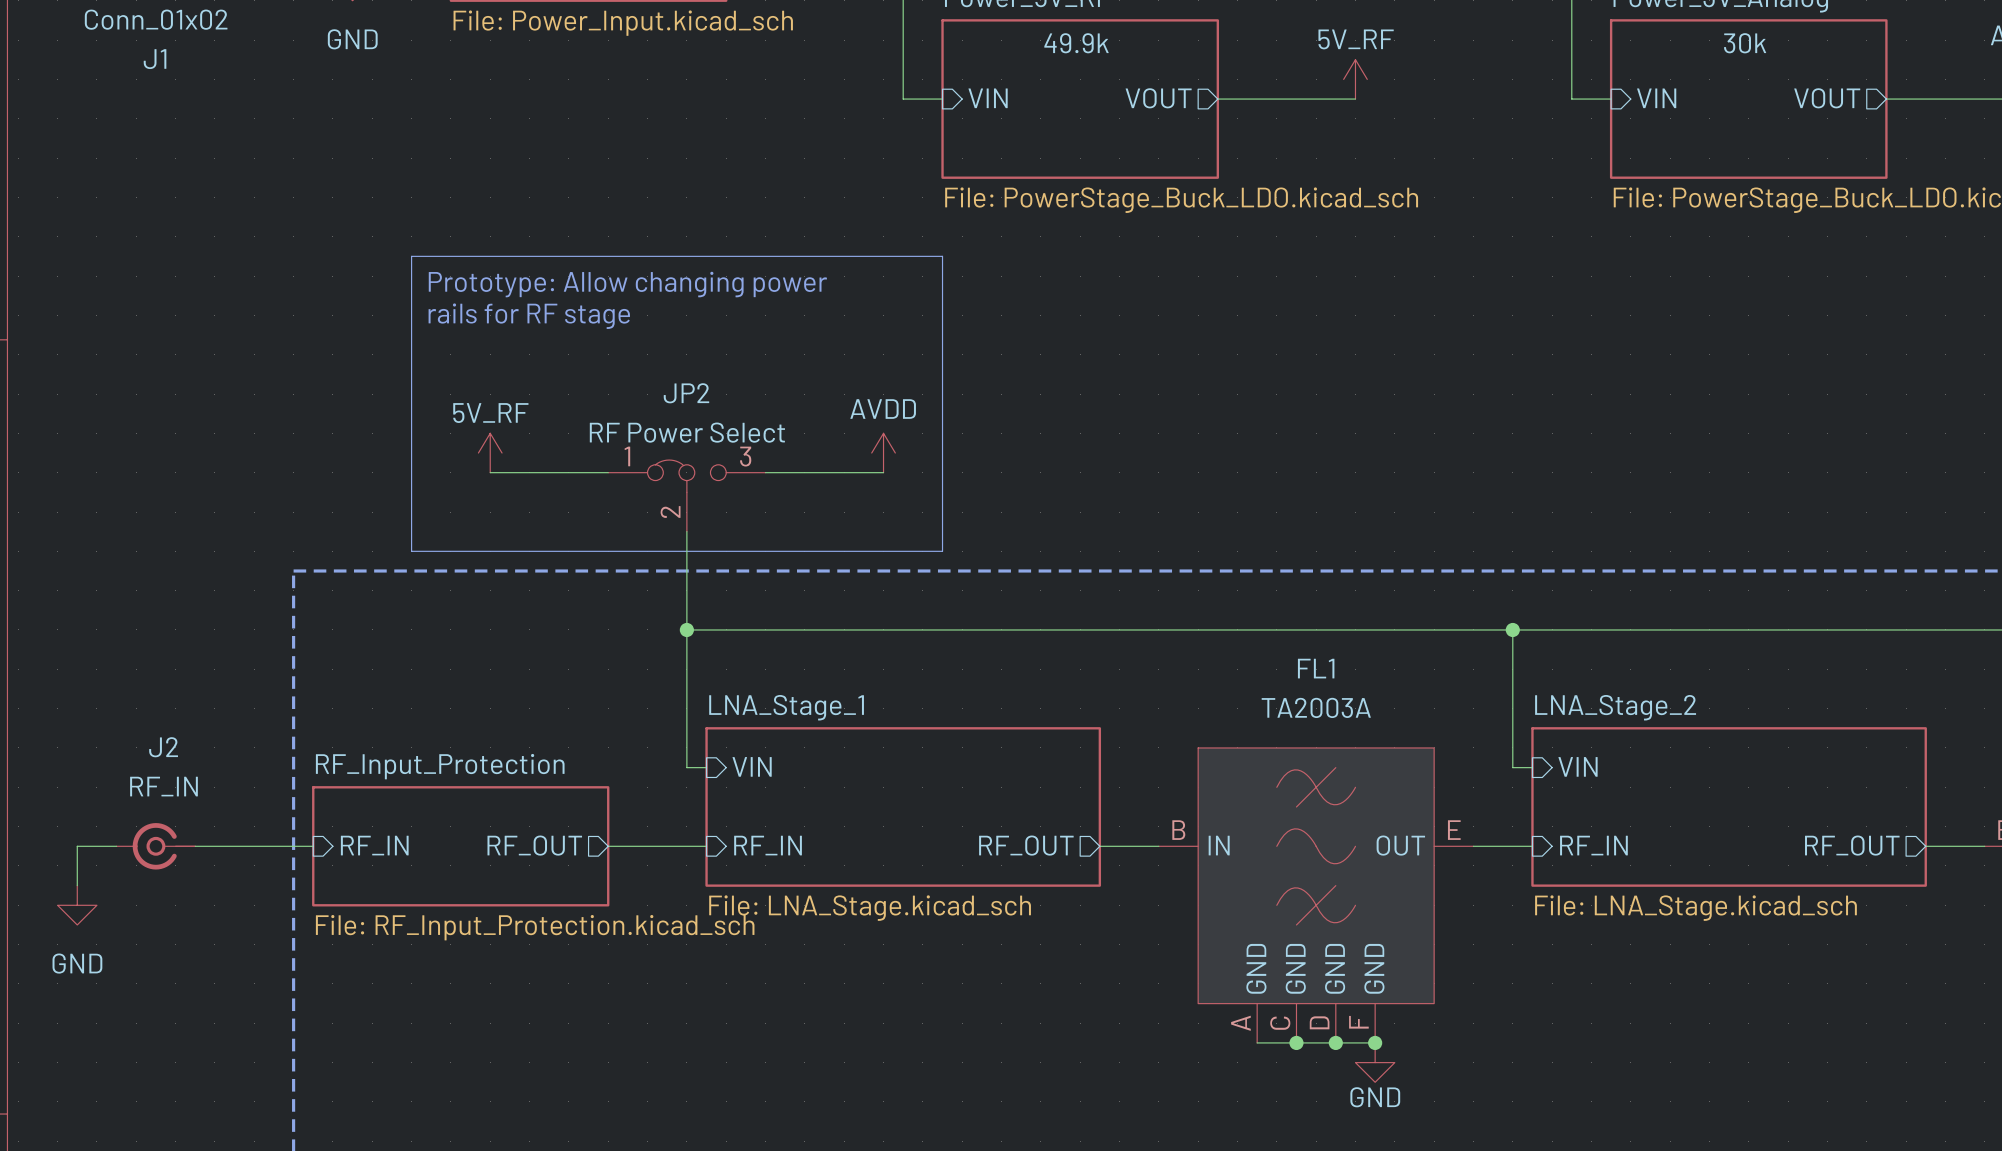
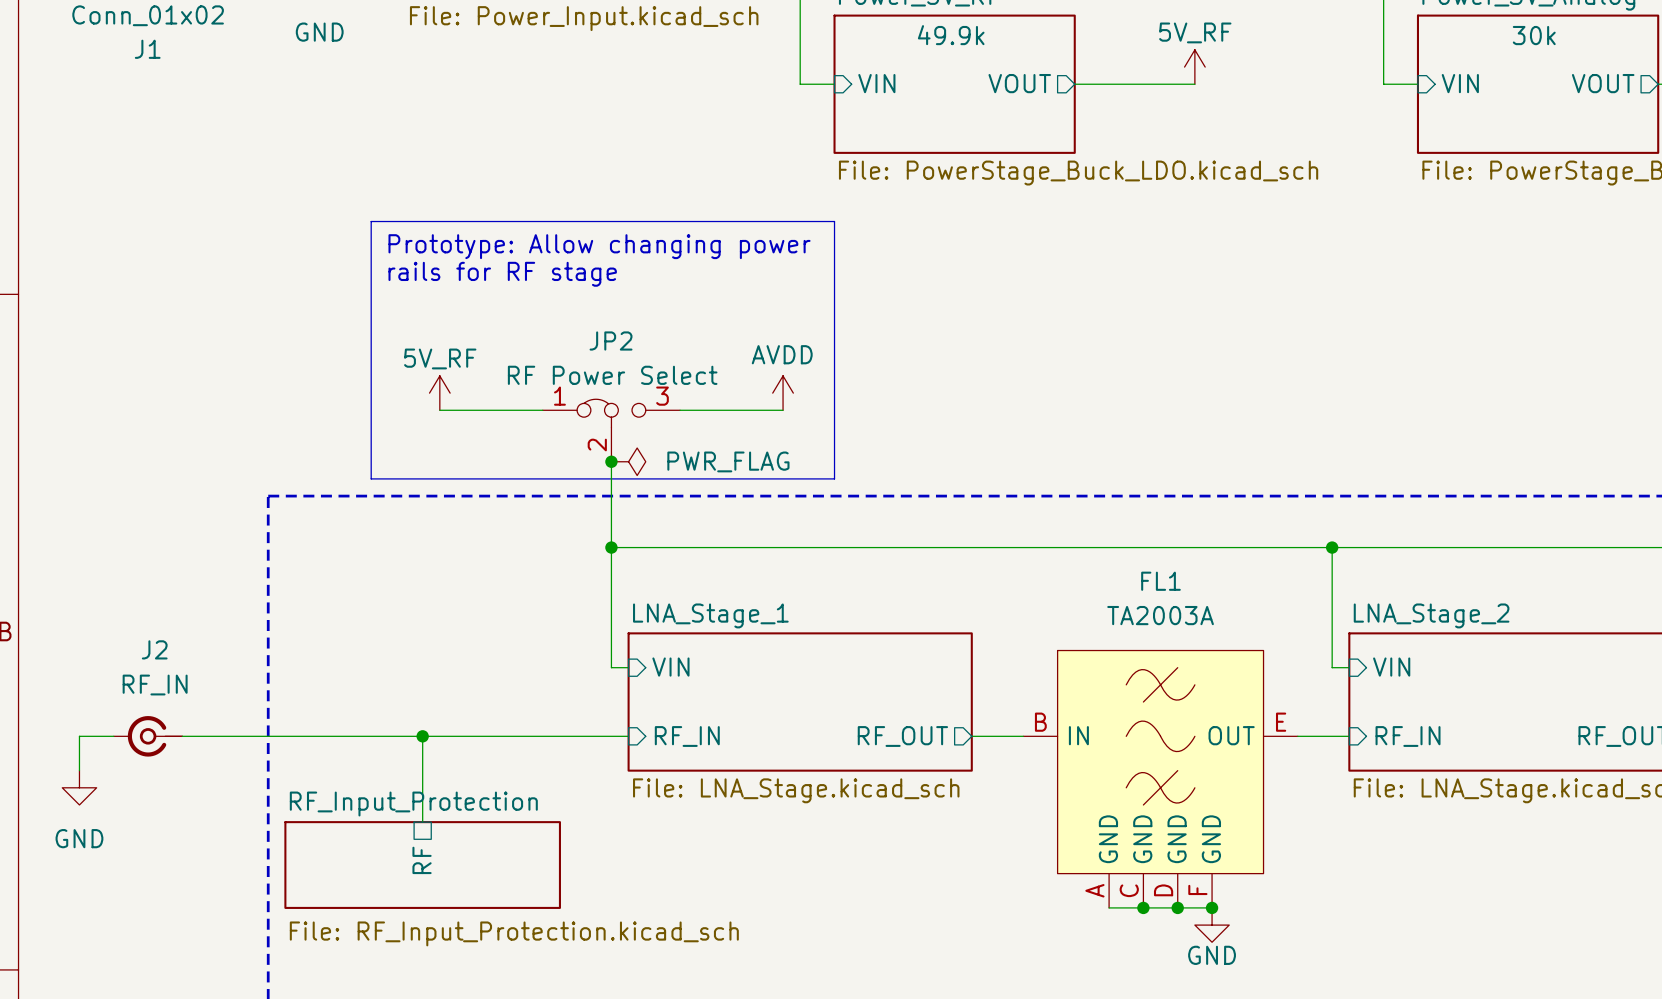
junction: none -> (611, 461)
power symbol: none -> PWR_FLAG (628, 461)
sheet pin: RF_IN (374, 845) -> none
sheet pin: RF_OUT (534, 845) -> none
wire: none -> (285, 736) (542, 736)
sheet RF_Input_Protection: File: RF_Input_Protection.kicad_sch (460, 846) -> none
wire: none -> (422, 736) (422, 822)
junction: none -> (422, 736)
sheet pin: none -> RF (422, 860)
sheet RF_Input_Protection: none -> File: RF_Input_Protection.kicad_sch (422, 865)

